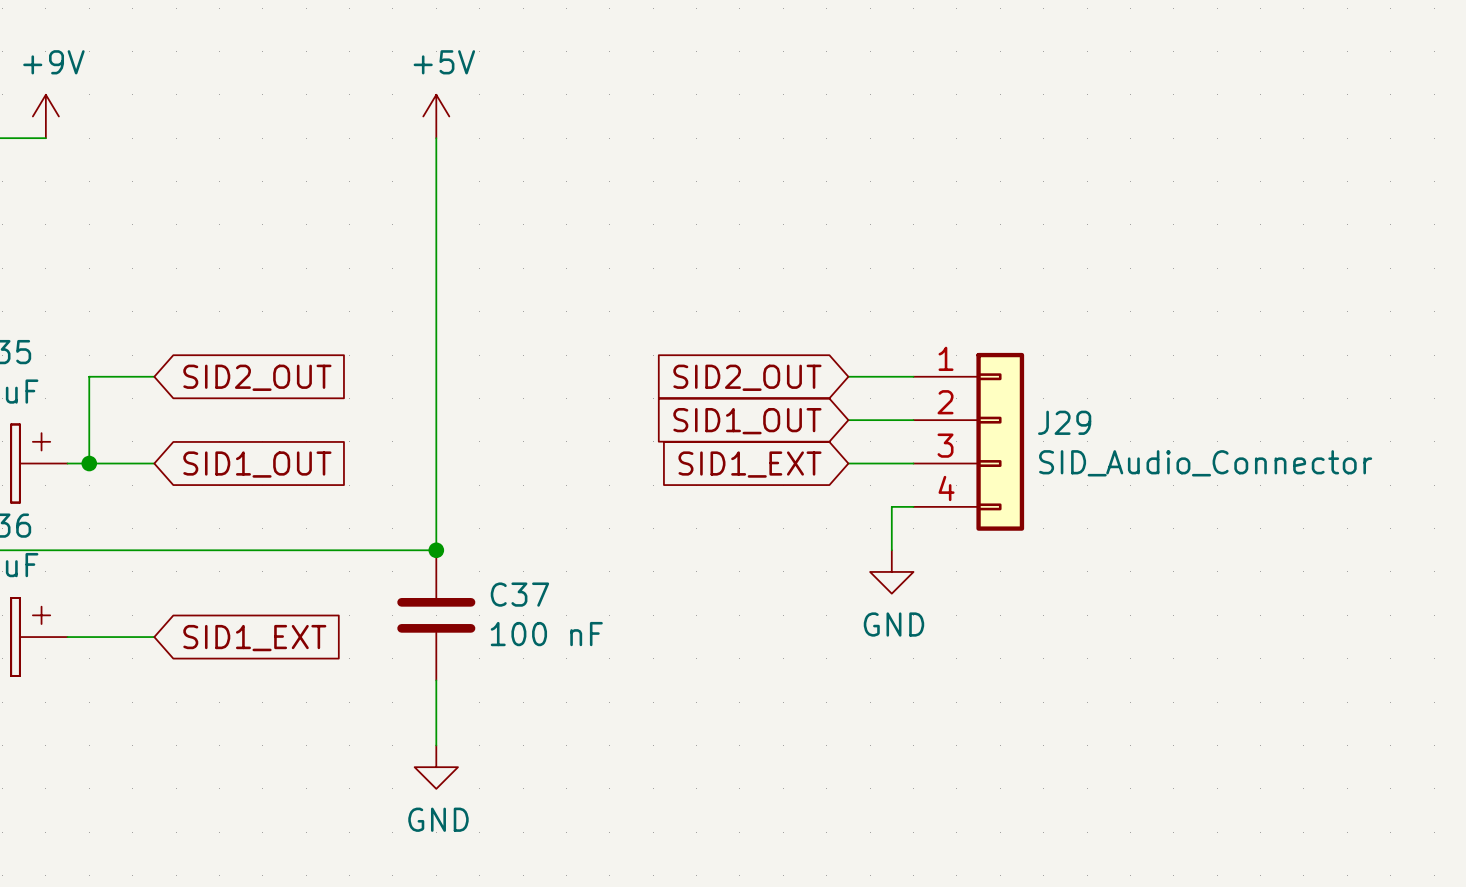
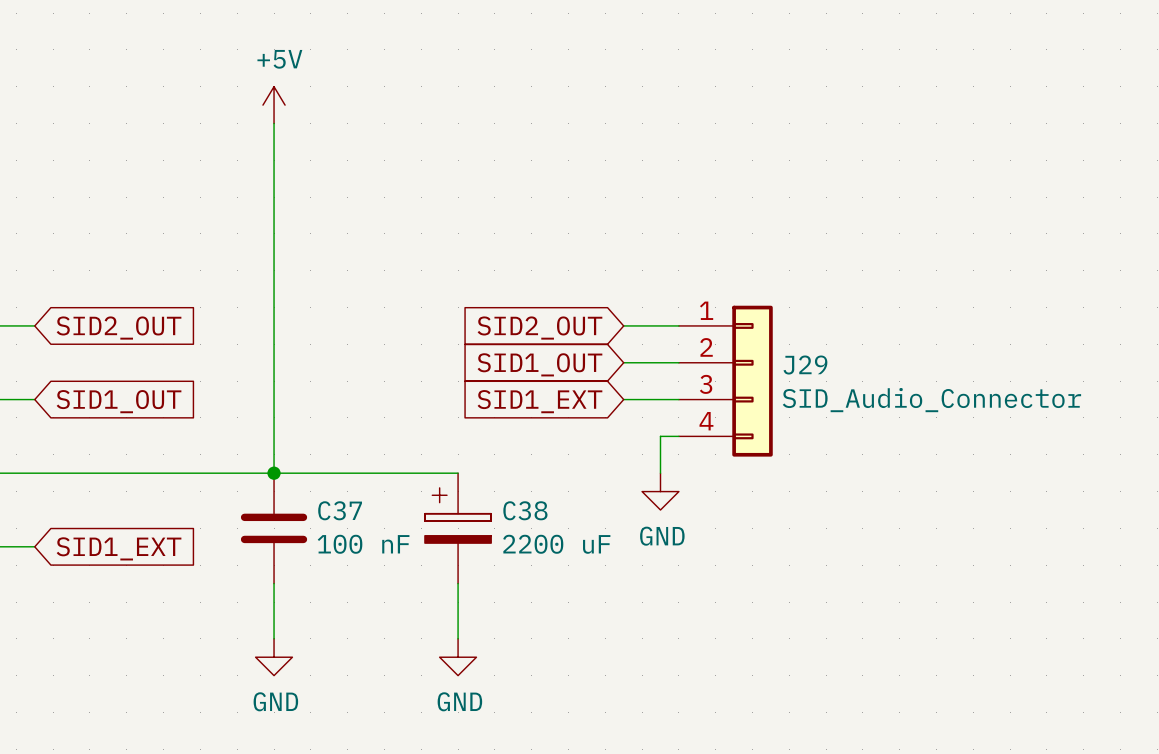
wire: none -> (274, 473) (458, 473)
C38: none -> 2200 uF (458, 528)
wire: none -> (458, 583) (458, 638)
power symbol: none -> GND (458, 657)

